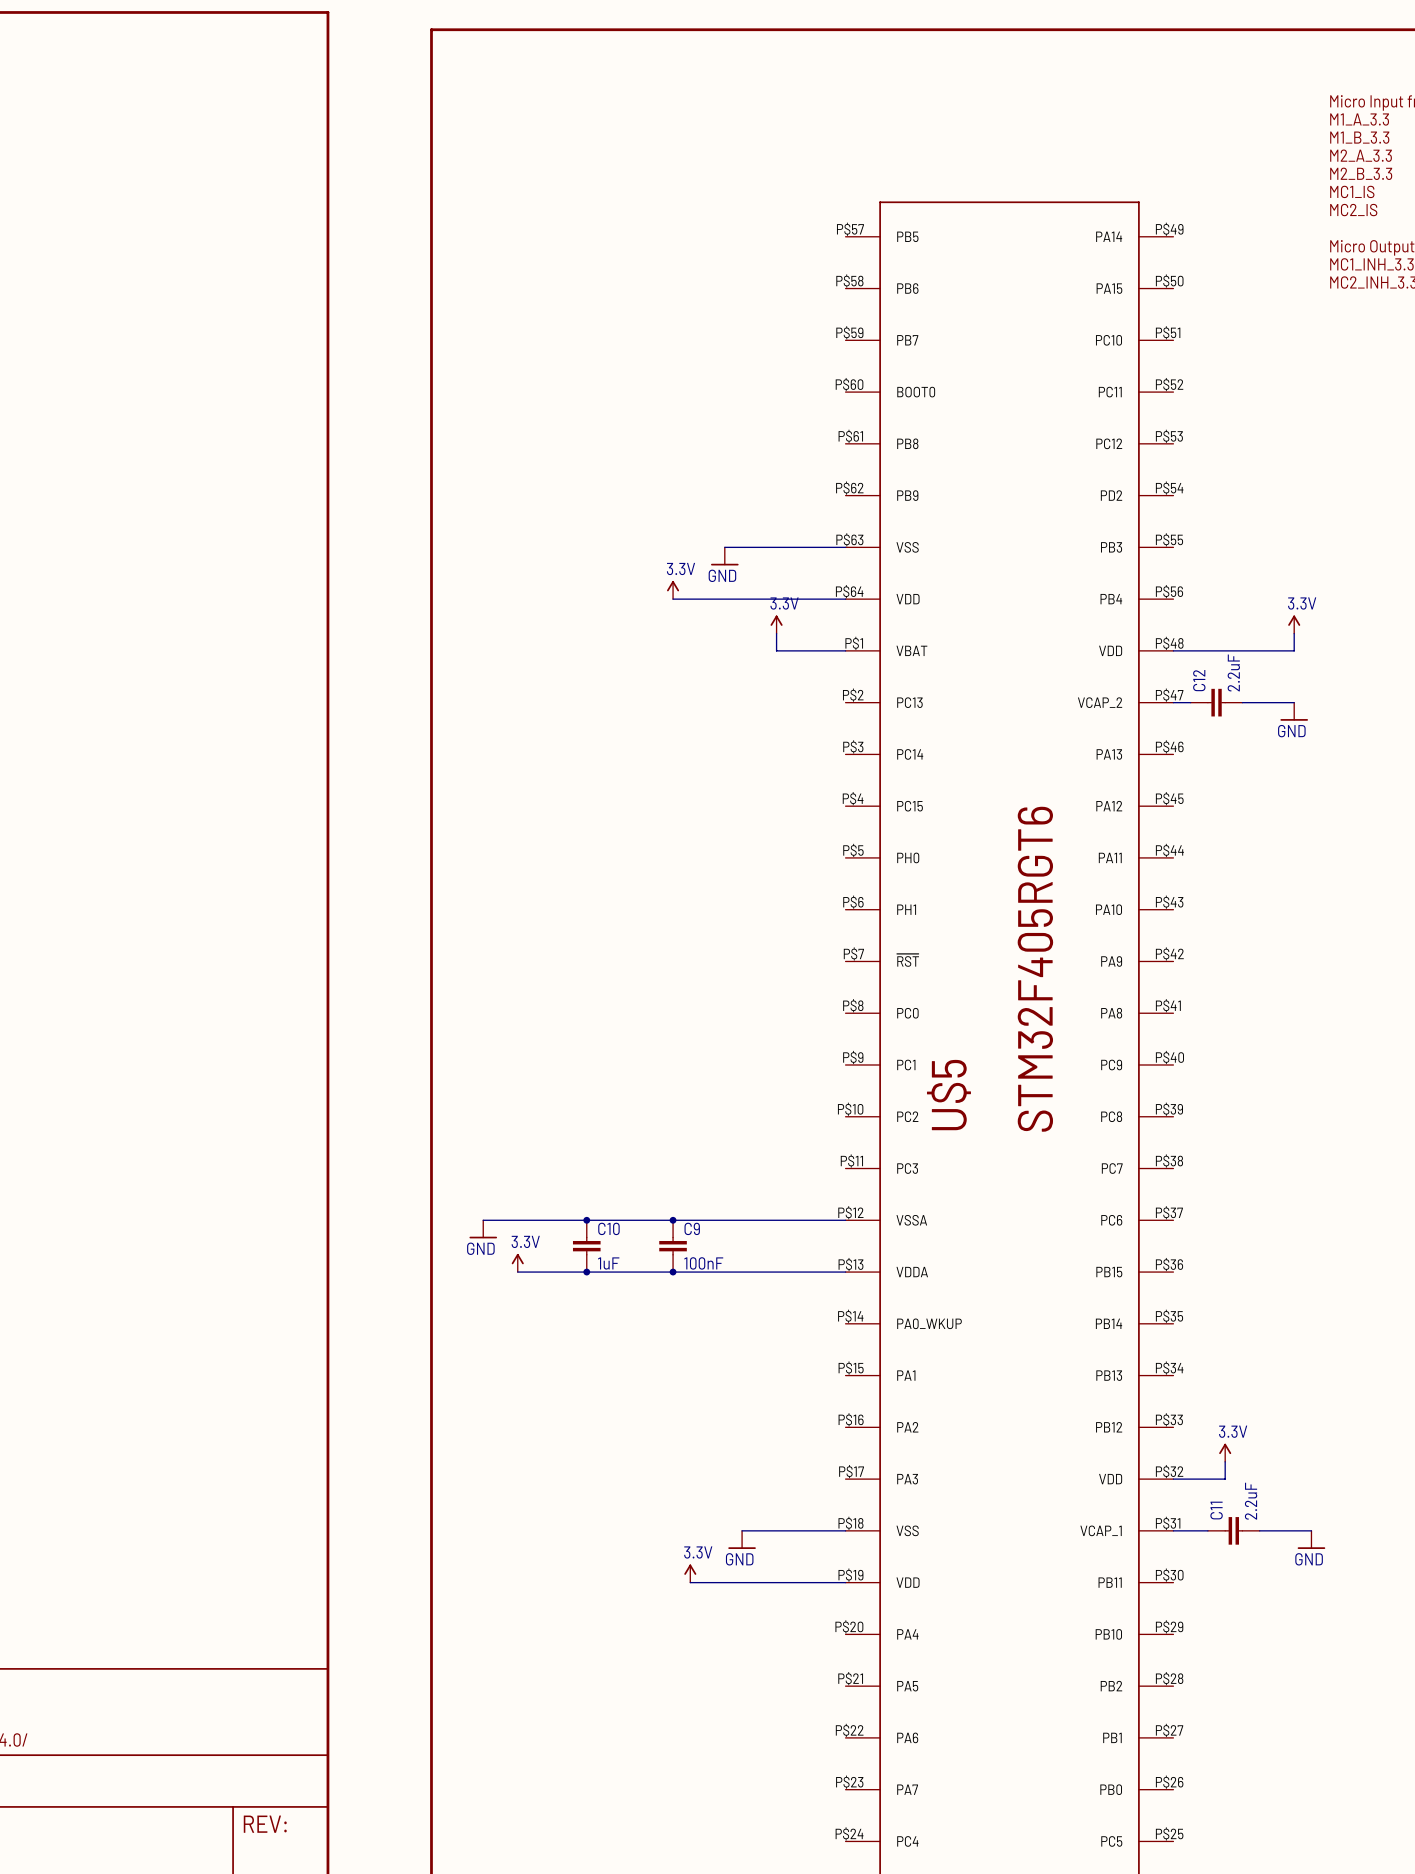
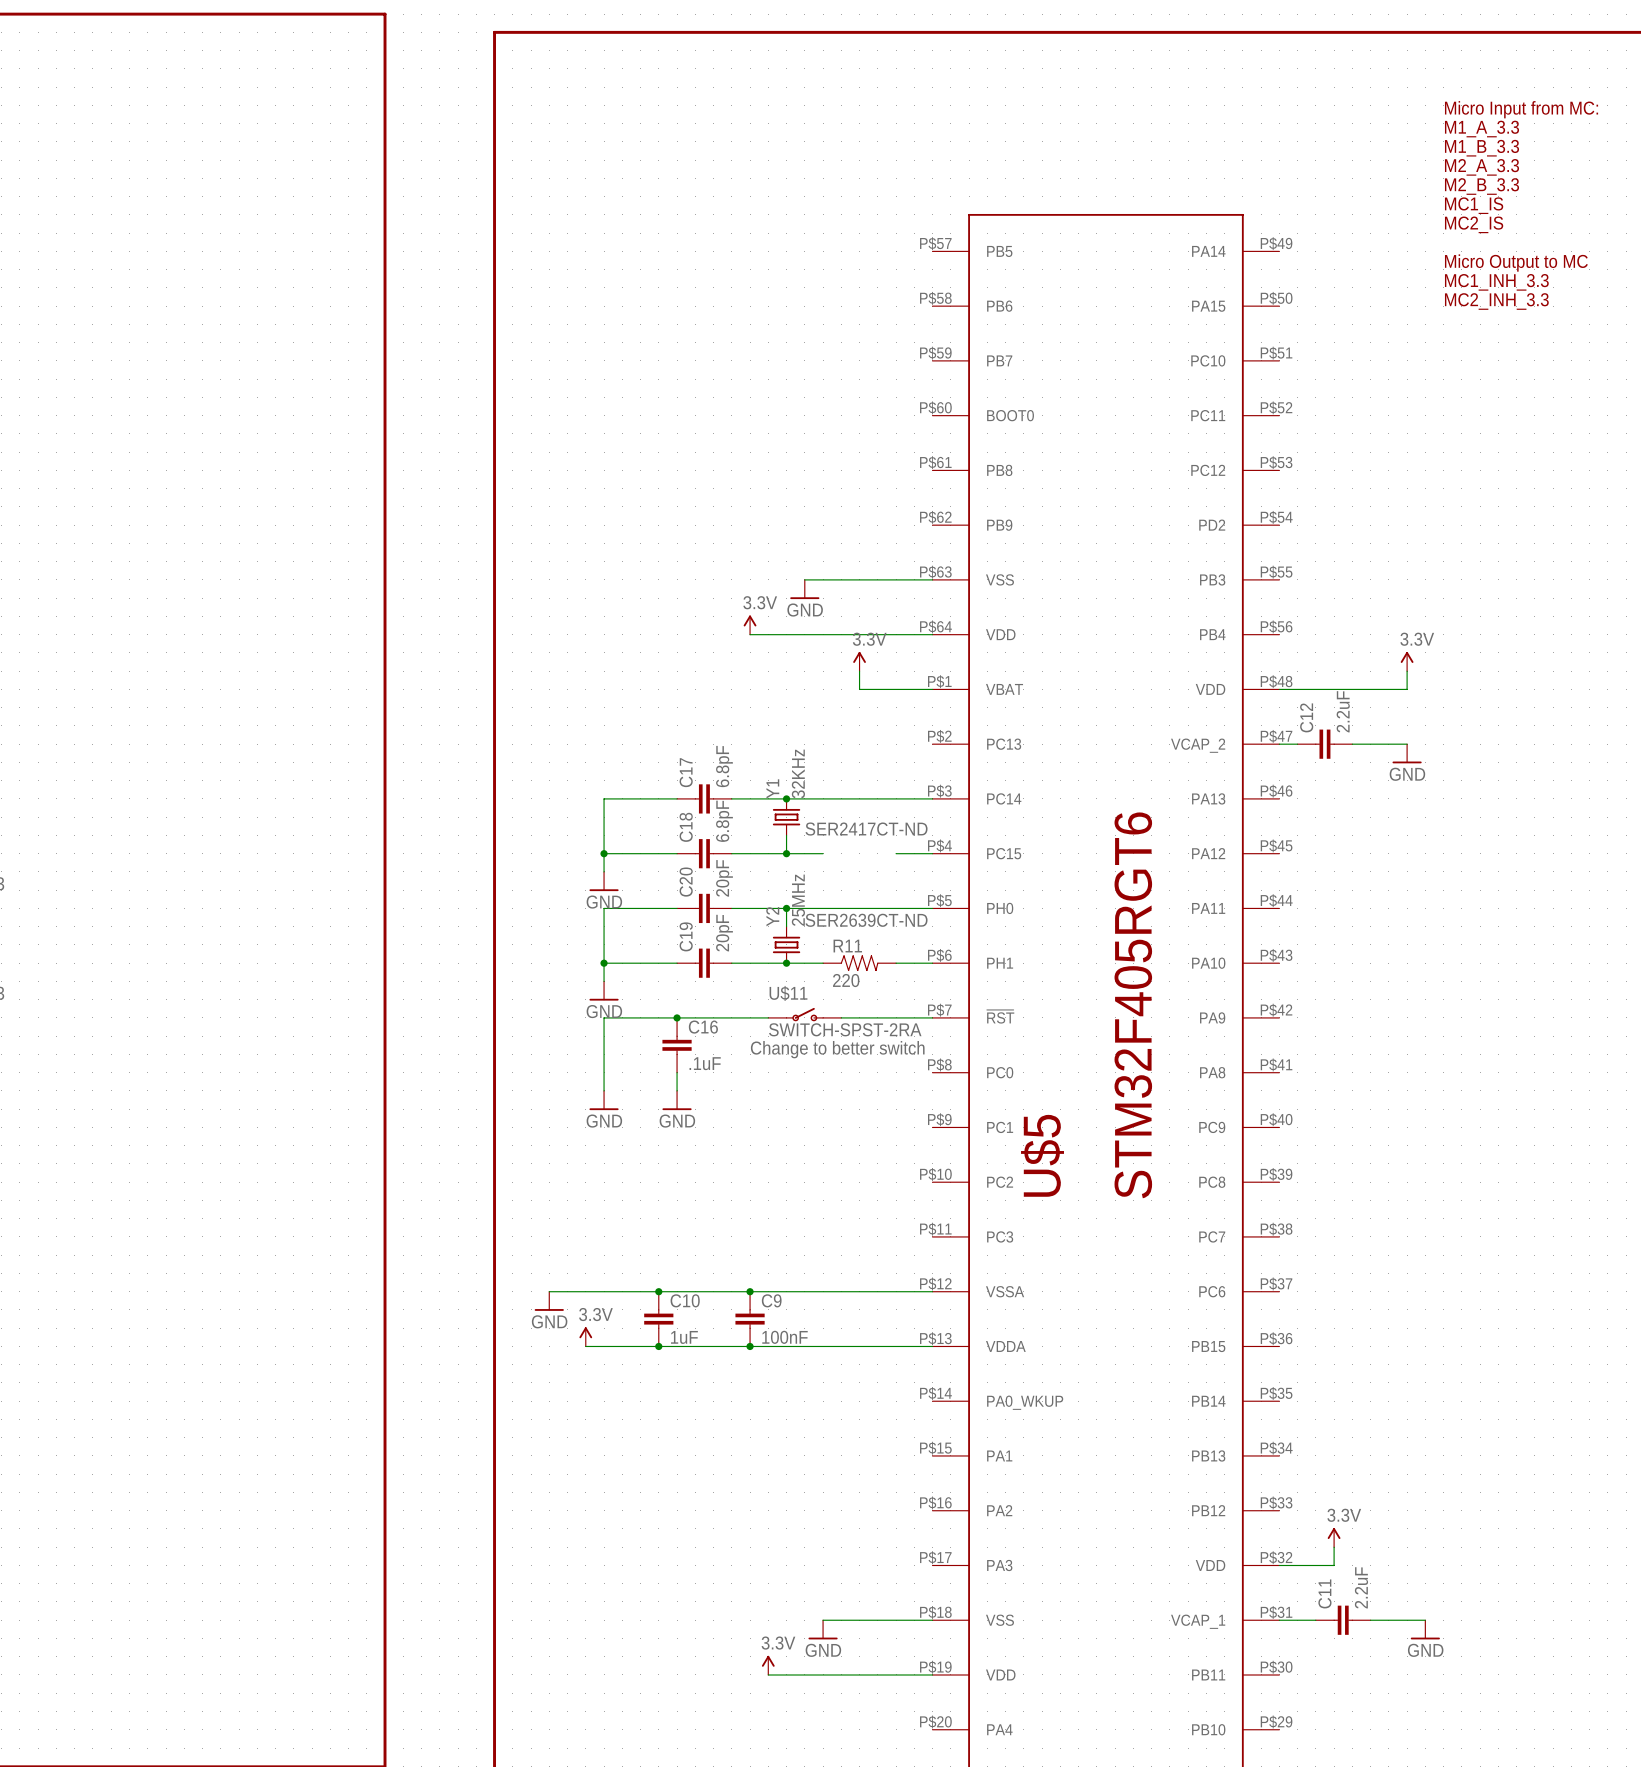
wire: none -> (677, 798) (604, 798) (604, 871)
C17: none -> 6.8pF (704, 798)
wire: none -> (731, 798) (932, 798)
junction: none -> (786, 798)
Y1: none -> 32KHz (786, 817)
text: none -> SER2417CT-ND (866, 829)
wire: none -> (786, 835) (786, 853)
wire: none -> (604, 853) (677, 853)
junction: none -> (604, 853)
C18: none -> 6.8pF (704, 853)
wire: none -> (731, 853) (823, 853)
junction: none -> (786, 853)
wire: none -> (896, 853) (932, 853)
power symbol: none -> GND (604, 881)
wire: none -> (677, 908) (604, 908) (604, 981)
C20: none -> 20pF (704, 908)
wire: none -> (731, 908) (932, 908)
wire: none -> (786, 908) (786, 926)
junction: none -> (786, 908)
text: none -> SER2639CT-ND (866, 920)
Y2: none -> 25MHz (786, 944)
wire: none -> (604, 963) (677, 963)
junction: none -> (604, 963)
C19: none -> 20pF (704, 963)
wire: none -> (731, 963) (823, 963)
junction: none -> (786, 963)
R11: none -> 220 (859, 963)
wire: none -> (896, 963) (932, 963)
power symbol: none -> GND (604, 991)
U$11: none -> SWITCH-SPST-2RA (804, 1014)
junction: none -> (677, 1017)
wire: none -> (768, 1017) (604, 1017) (604, 1090)
wire: none -> (841, 1017) (932, 1017)
C16: none -> .1uF (677, 1045)
text: none -> Change to better switch (837, 1049)
wire: none -> (677, 1072) (677, 1090)
power symbol: none -> GND (604, 1100)
power symbol: none -> GND (677, 1100)

